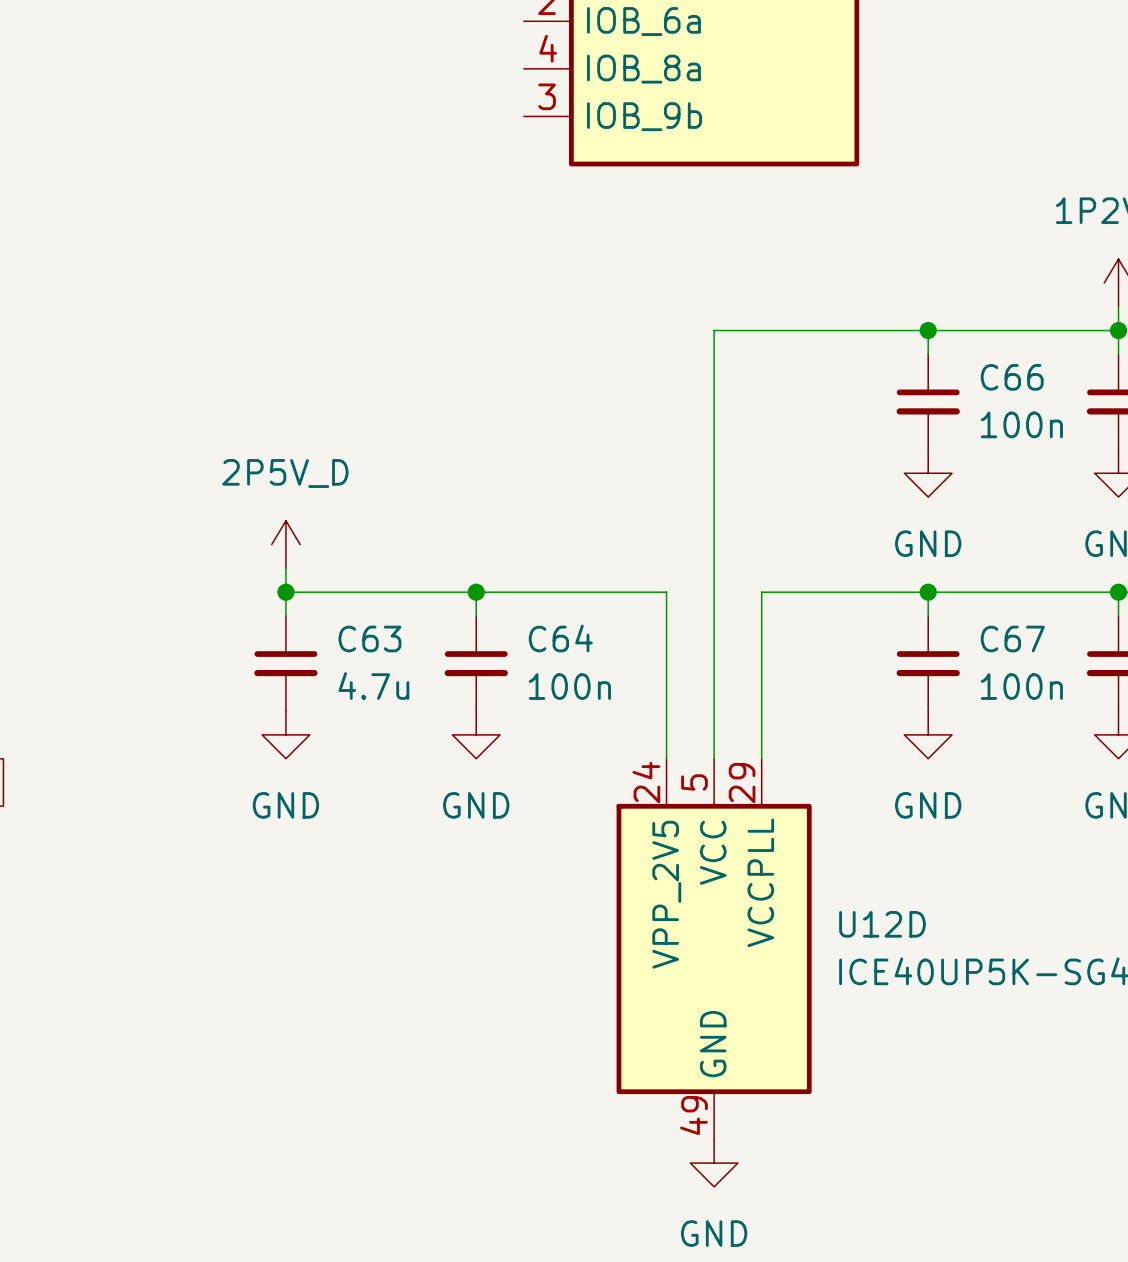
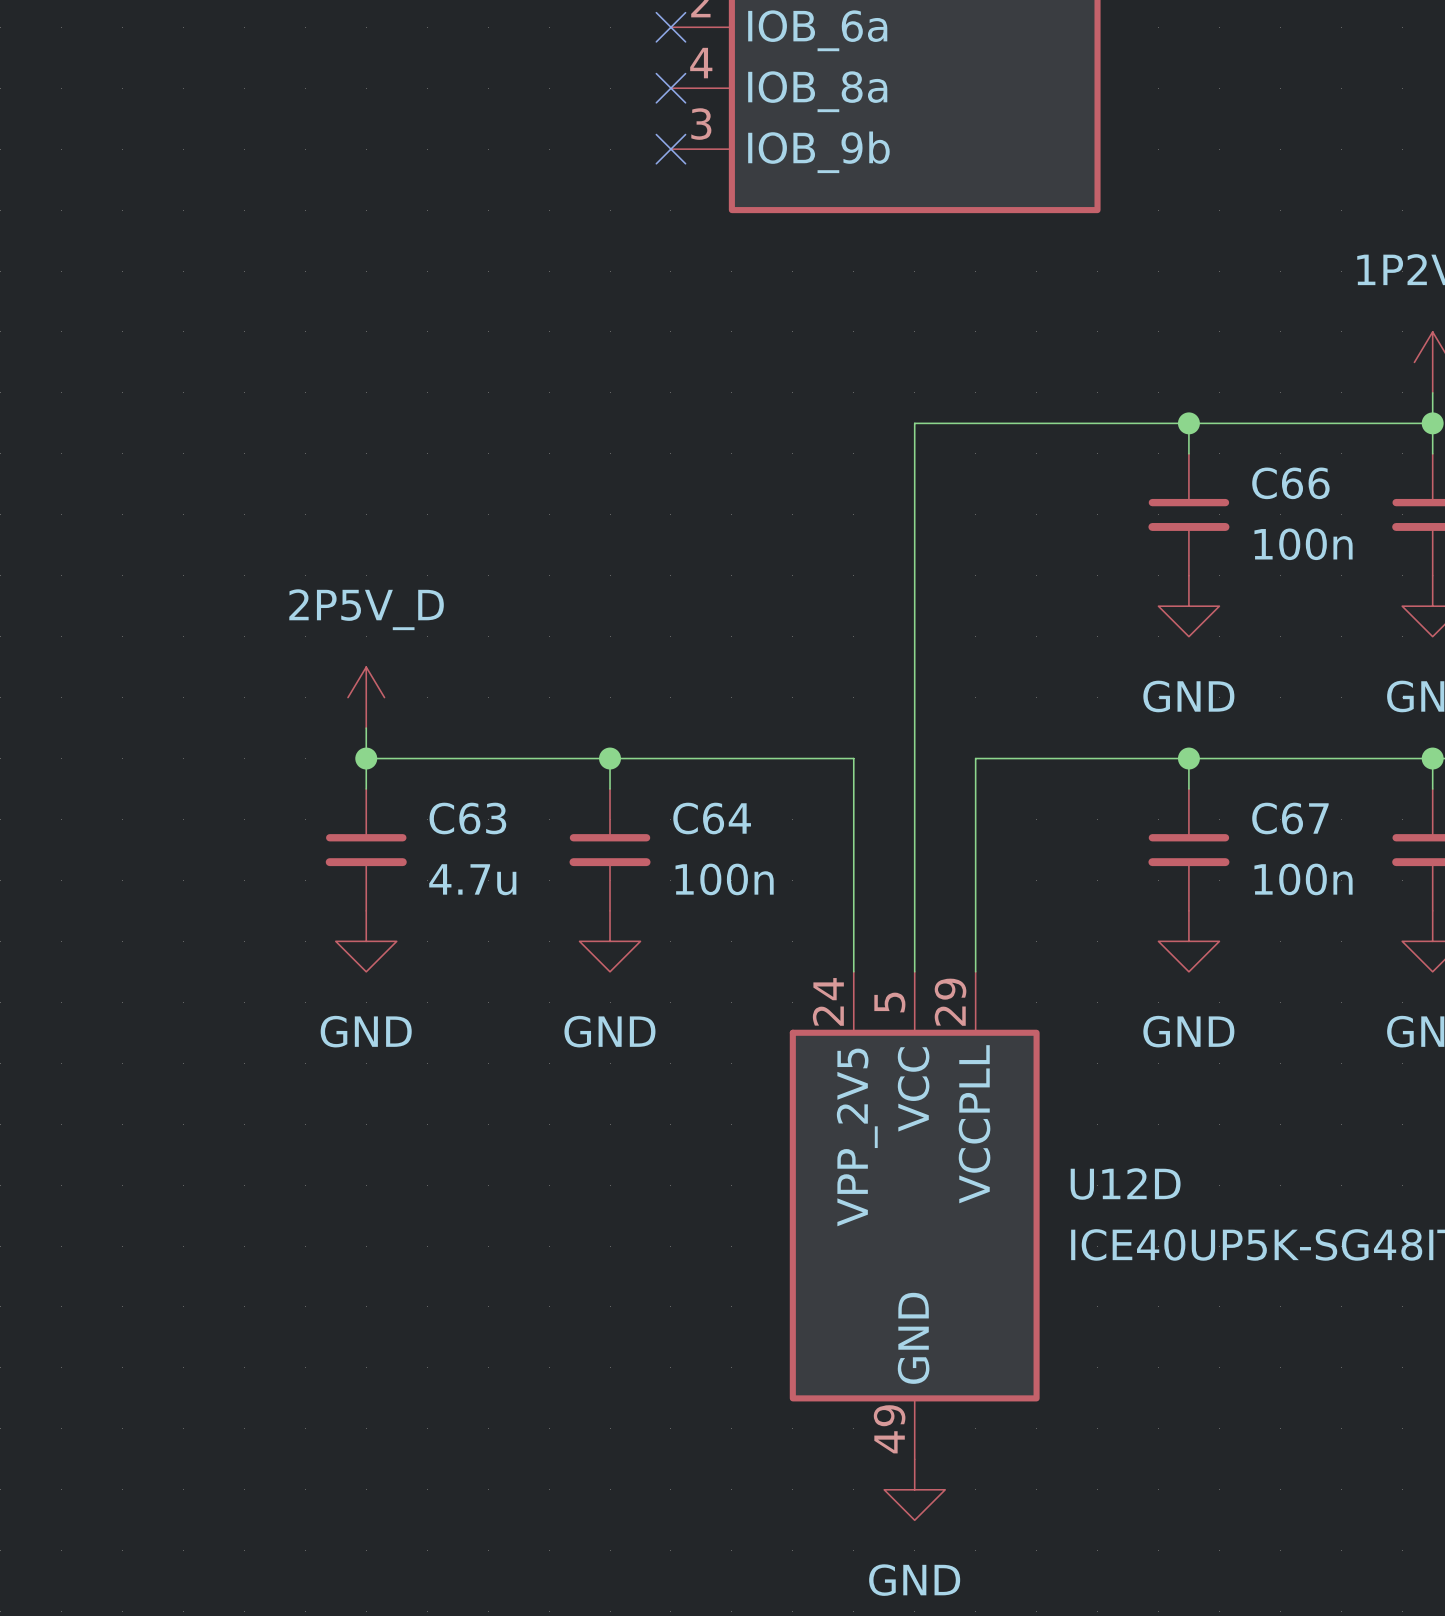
no-connect mark: none -> (670, 27)
no-connect mark: none -> (670, 88)
no-connect mark: none -> (670, 149)

